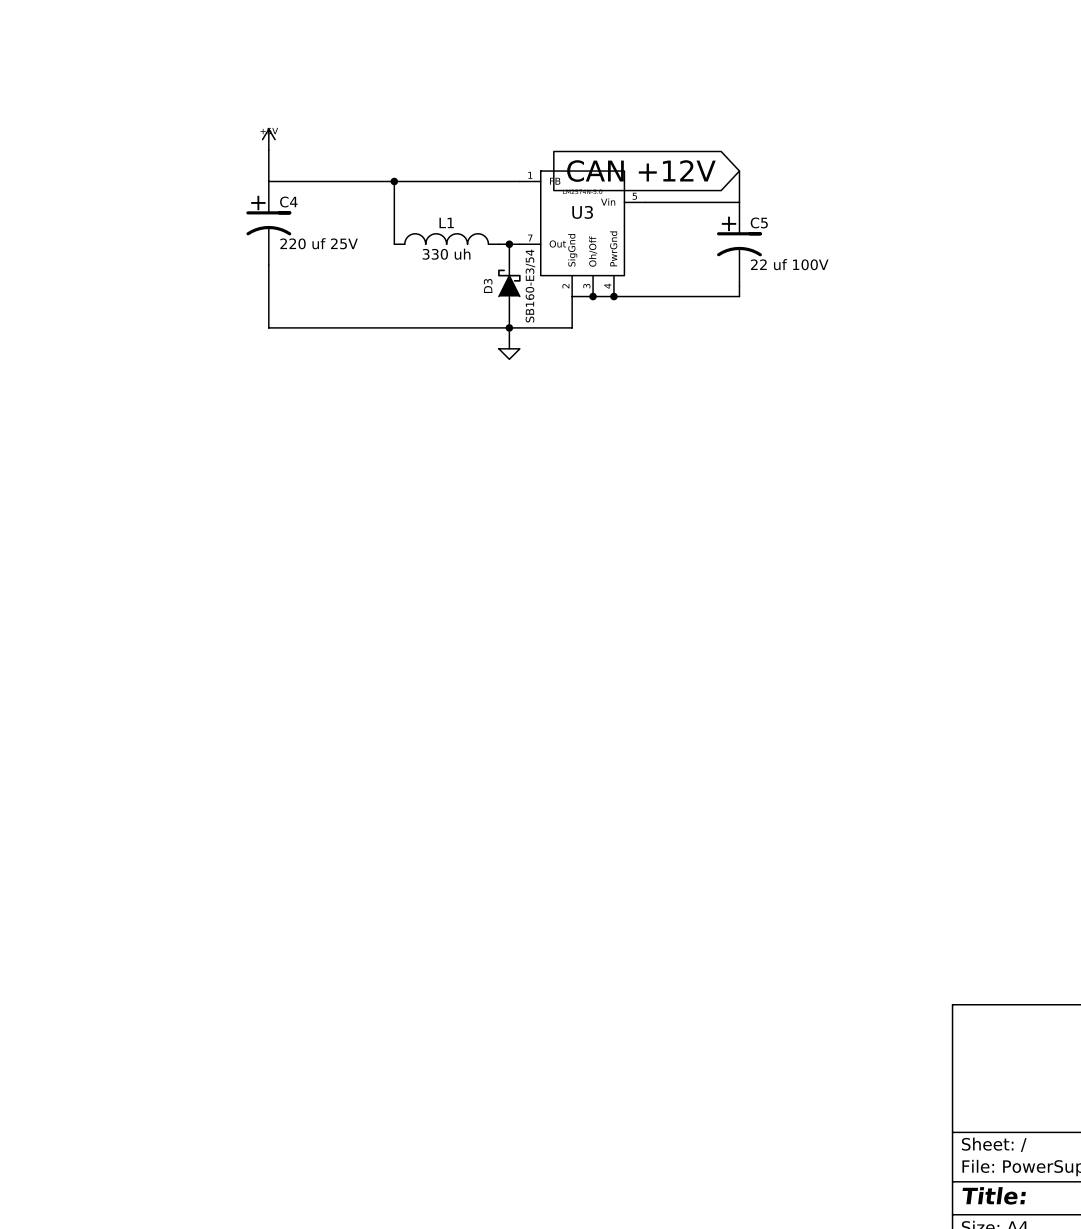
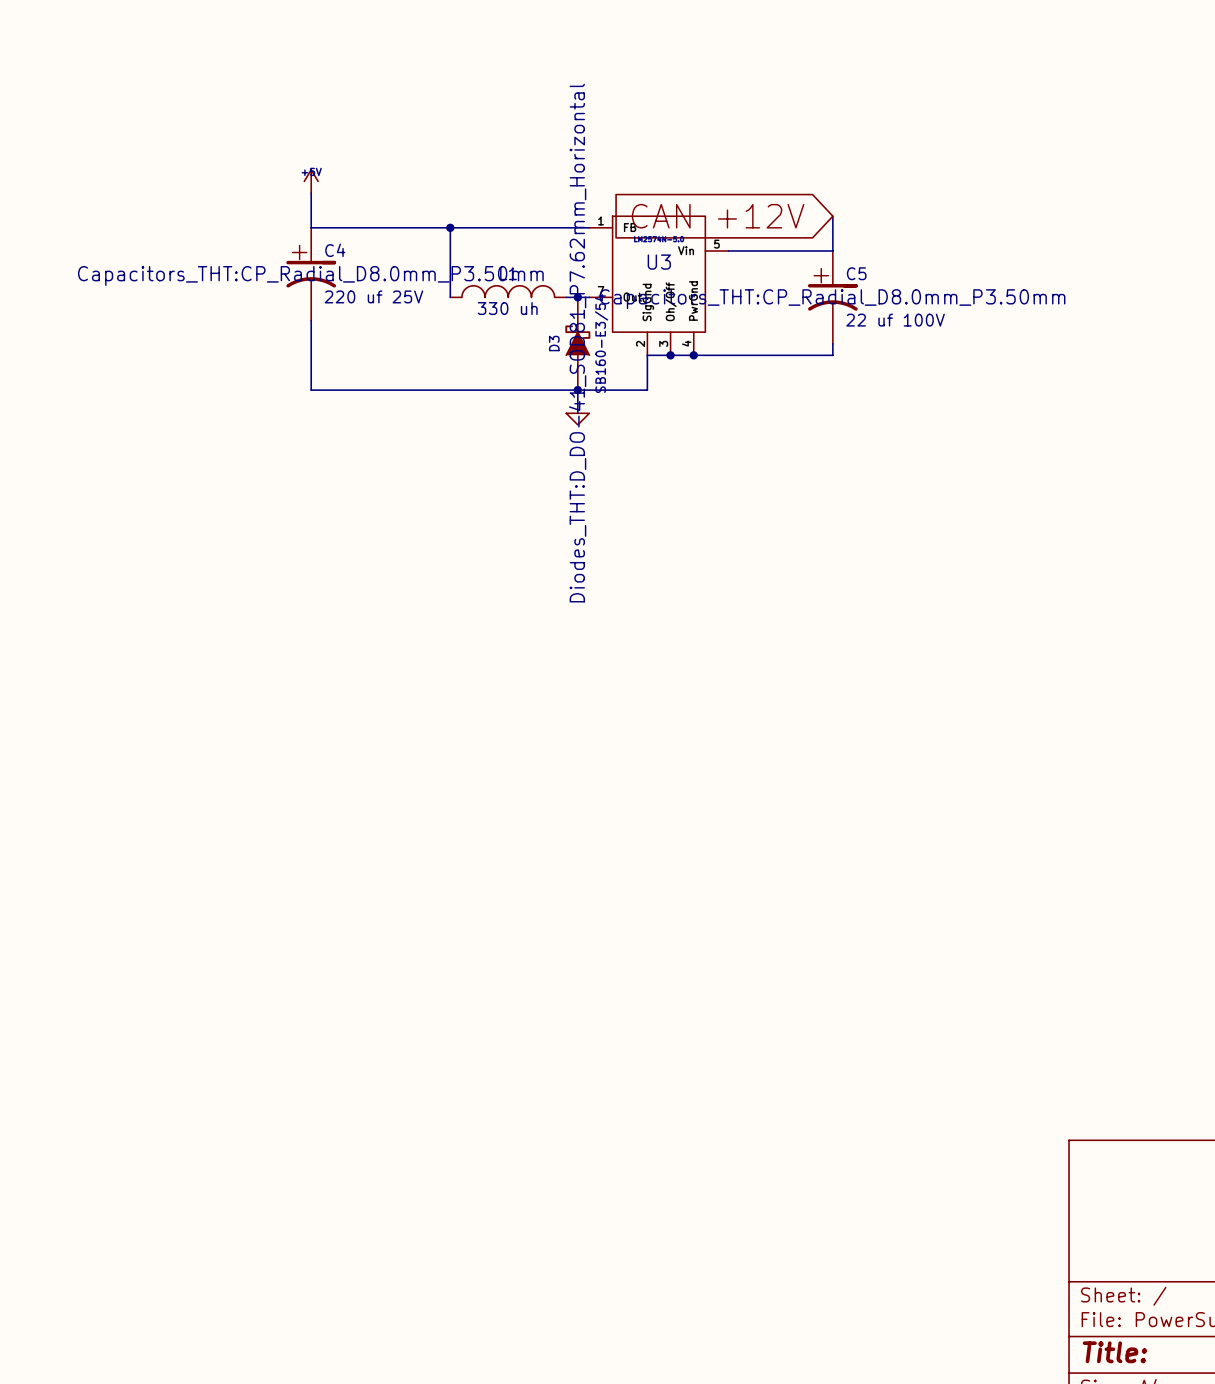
C4 text: none -> Capacitors_THT:CP_Radial_D8.0mm_P3.50mm (310, 275)
C5 text: none -> Capacitors_THT:CP_Radial_D8.0mm_P3.50mm (832, 299)
D3 text: none -> Diodes_THT:D_DO-41_SOD81_P7.62mm_Horizontal (577, 343)

